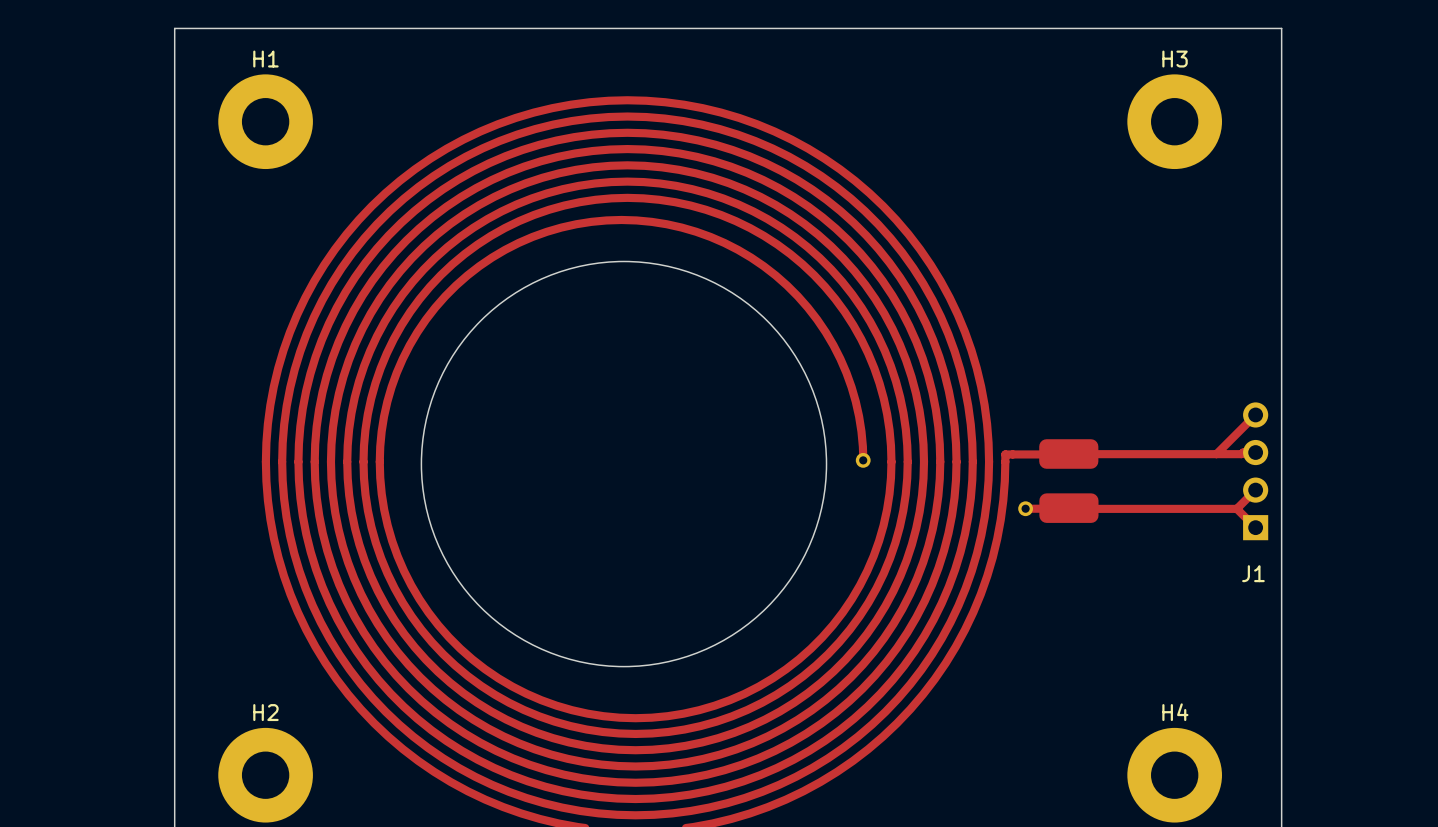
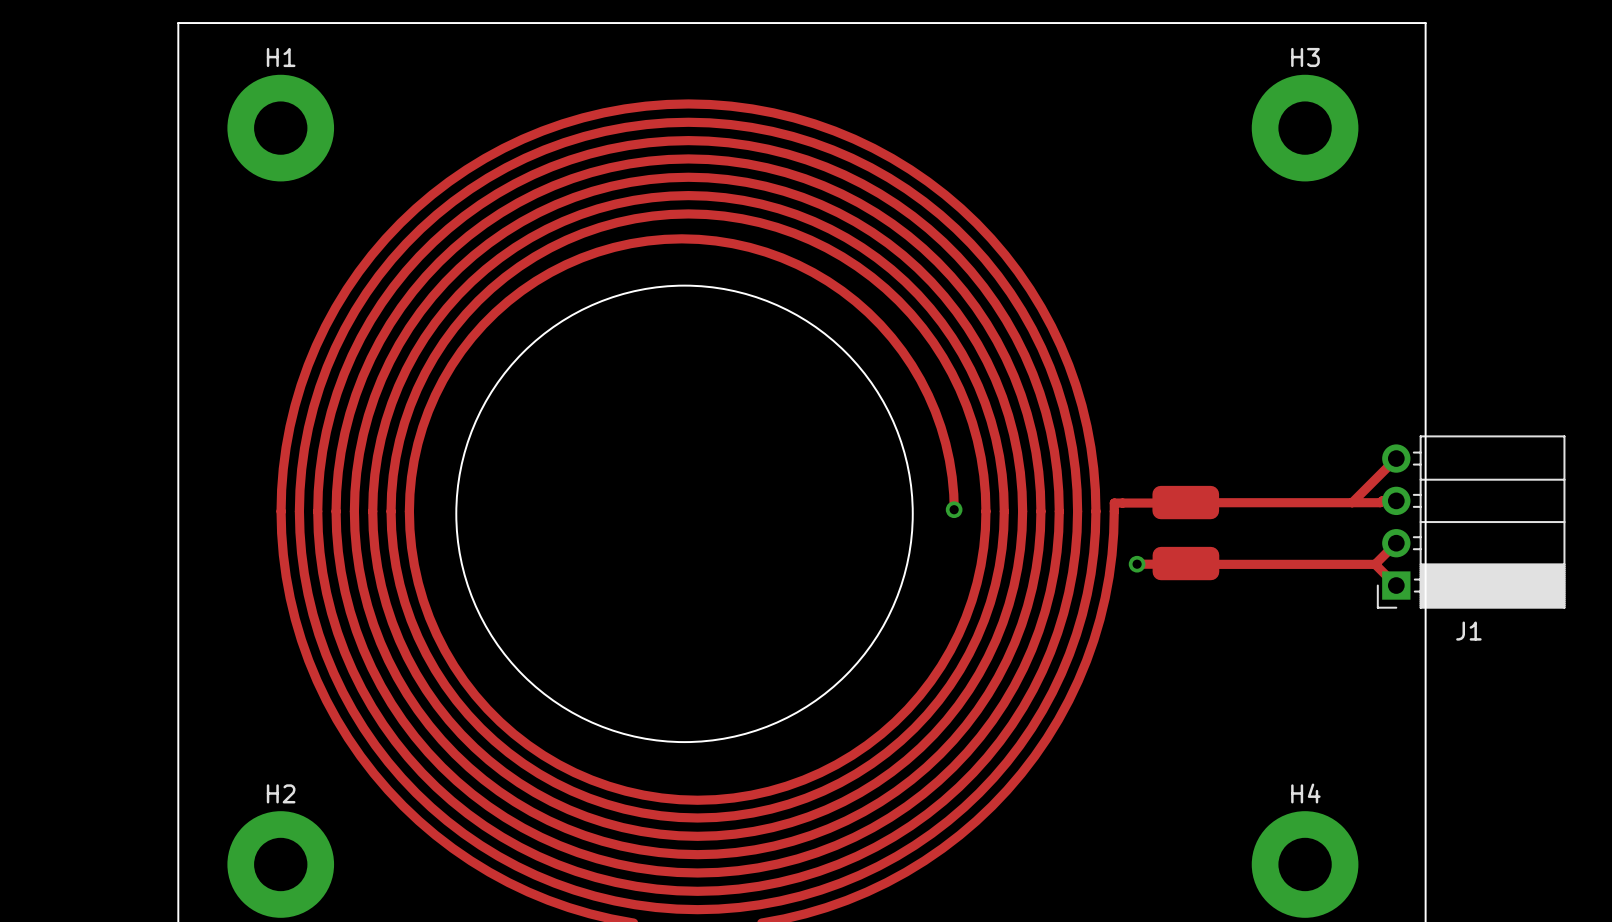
J1 side: bottom (1255, 471) -> top (1471, 522)

